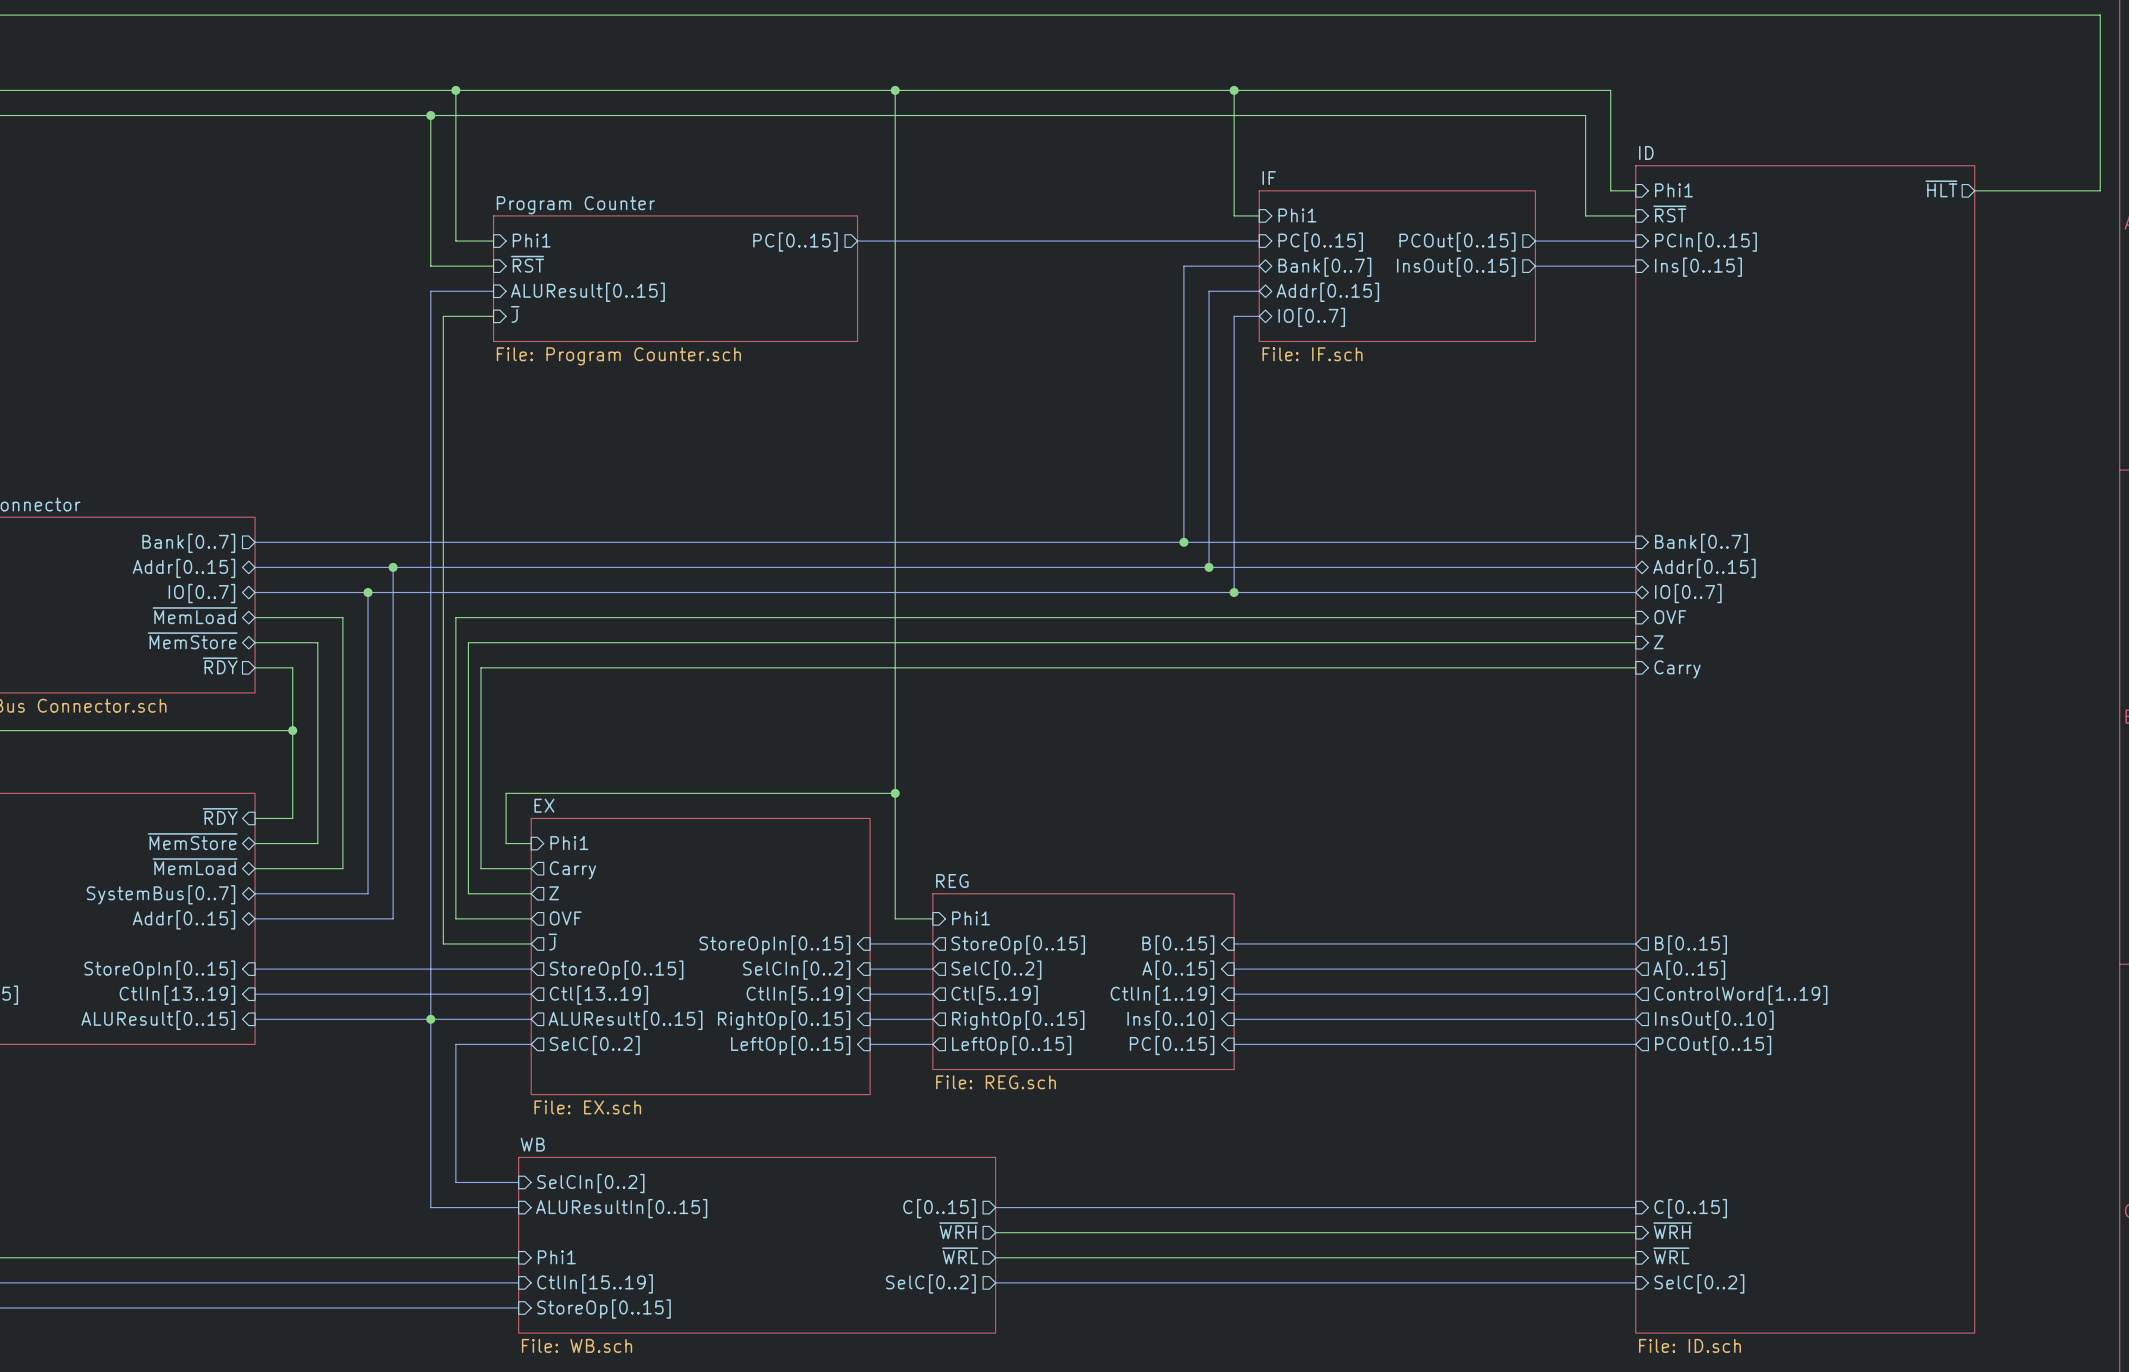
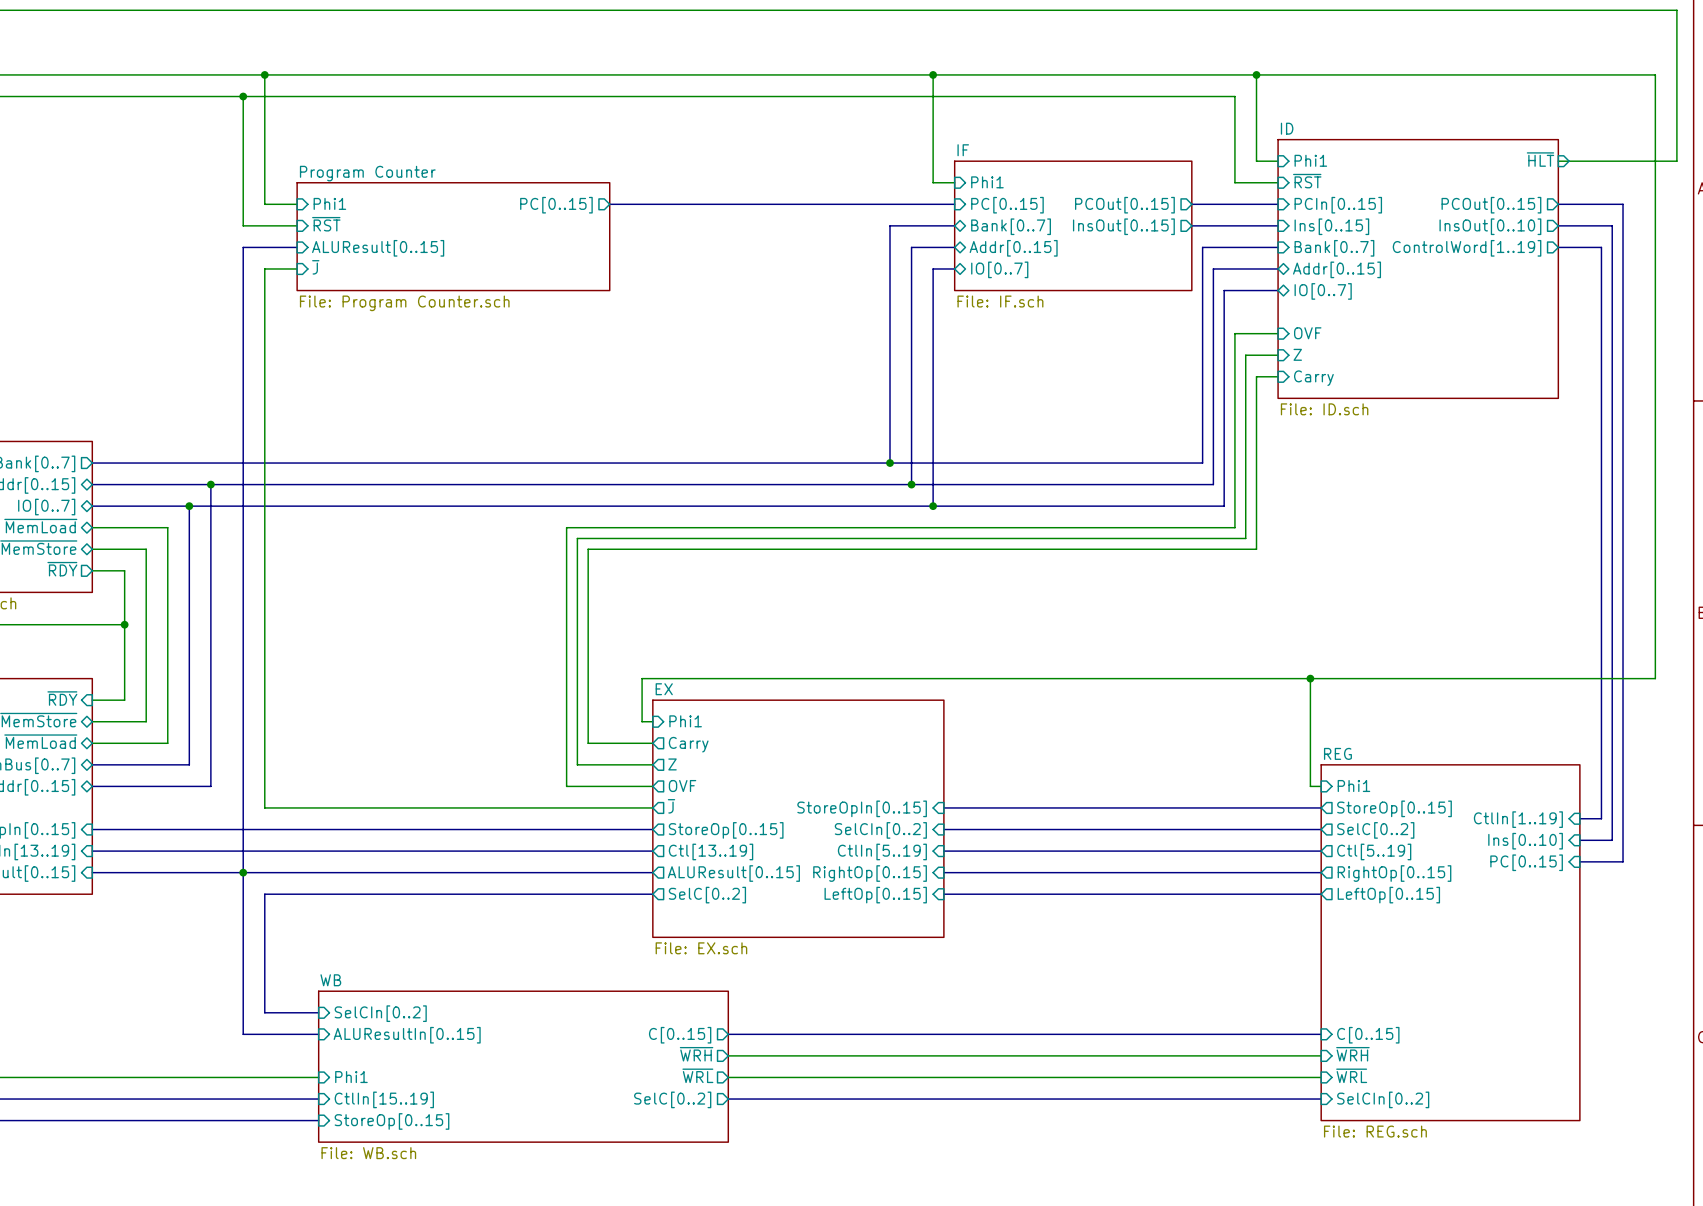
wire: (895, 90) (895, 793) (506, 793) (506, 843) (531, 843) -> none
junction: (895, 90) -> none
wire: none -> (1256, 74) (1655, 74) (1655, 678) (642, 678)
junction: none -> (1256, 74)
wire: none -> (1558, 161) (1569, 161)
bus: none -> (1558, 204) (1623, 204) (1623, 861) (1579, 861)
sheet pin: none -> PCOut[0..15] (1491, 205)
bus: none -> (1558, 225) (1612, 225) (1612, 840) (1579, 840)
sheet pin: none -> InsOut[0..10] (1490, 226)
bus: none -> (1558, 247) (1601, 247) (1601, 818) (1579, 818)
sheet pin: none -> Bank[0..7] (1334, 248)
sheet pin: none -> ControlWord[1..19] (1467, 248)
wire: (455, 316) (443, 316) (443, 943) (455, 943) -> (264, 268) (264, 527)
sheet ID: none -> File: ID.sch (1418, 268)
sheet pin: none -> Addr[0..15] (1337, 269)
sheet pin: none -> IO[0..7] (1323, 291)
wire: none -> (1278, 355) (1245, 355) (1245, 538) (577, 538) (577, 764) (652, 764)
bus: (1547, 542) (1635, 542) -> (1202, 463) (1202, 247) (1278, 247)
sheet pin: Bank[0..7] (1701, 543) -> none
bus: (1560, 567) (1635, 567) -> (1213, 484) (1213, 268) (1278, 268)
sheet pin: Addr[0..15] (1704, 568) -> none
bus: (1573, 592) (1635, 592) -> (1224, 506) (1224, 290) (1278, 290)
sheet pin: IO[0..7] (1688, 593) -> none
wire: (455, 617) (807, 617) -> (642, 786) (566, 786) (566, 527)
wire: (1585, 617) (1635, 617) -> (1234, 527) (1234, 333) (1278, 333)
sheet pin position: OVF (1670, 617) -> OVF (1307, 333)
wire: (832, 642) (468, 642) (468, 893) (531, 893) -> (588, 549) (588, 743) (652, 743)
wire: (1610, 642) (1635, 642) -> (1256, 549) (1256, 376) (1278, 376)
sheet pin position: Z (1658, 642) -> Z (1297, 354)
wire: (1635, 667) (480, 667) (480, 868) (531, 868) -> none
sheet pin position: Carry (1677, 669) -> Carry (1313, 378)
sheet ID: File: ID.sch (1805, 749) -> none
junction: (895, 793) -> none
wire: none -> (1310, 678) (1310, 786) (1321, 786)
junction: none -> (1310, 678)
sheet pin: Phi1 (569, 843) -> none
wire: (895, 843) (895, 918) -> (642, 721) (652, 721)
sheet pin: Carry (572, 870) -> none
sheet pin: none -> Carry (688, 744)
sheet pin: Z (554, 893) -> none
sheet pin: none -> Z (672, 764)
wire: (455, 918) (531, 918) -> (264, 786) (264, 807)
sheet pin: OVF (565, 918) -> none
wire: (907, 918) (932, 918) -> none
sheet pin: none -> OVF (682, 786)
sheet pin position: Phi1 (971, 918) -> Phi1 (685, 721)
sheet pin: none -> Phi1 (1353, 786)
sheet pin: ~{J} (552, 942) -> none
sheet pin: none -> ~{J} (671, 806)
wire: none -> (329, 807) (652, 807)
bus: (870, 943) (932, 943) -> none
bus: (1234, 943) (1246, 943) -> none
bus: none -> (1278, 807) (1321, 807)
sheet pin: StoreOpIn[0..15] (774, 945) -> none
sheet pin position: StoreOp[0..15] (1018, 945) -> StoreOp[0..15] (726, 830)
sheet pin: none -> StoreOpIn[0..15] (862, 808)
sheet pin: B[0..15] (1178, 945) -> none
sheet pin: B[0..15] (1690, 945) -> none
sheet pin: none -> StoreOp[0..15] (1394, 808)
sheet EX: File: EX.sch (700, 956) -> none
sheet EX: none -> File: EX.sch (798, 818)
sheet pin: none -> CtlIn[1..19] (1518, 819)
bus: none -> (329, 829) (620, 829)
bus: (907, 969) (932, 969) -> none
bus: (1234, 969) (1246, 969) -> none
bus: none -> (1278, 829) (1321, 829)
sheet pin: StoreOp[0..15] (616, 970) -> none
sheet pin: SelCIn[0..2] (796, 970) -> none
sheet pin position: SelC[0..2] (996, 970) -> SelC[0..2] (707, 895)
sheet pin: none -> SelCIn[0..2] (880, 830)
sheet pin: A[0..15] (1178, 970) -> none
sheet pin: A[0..15] (1689, 970) -> none
sheet pin: none -> SelC[0..2] (1375, 830)
sheet REG: File: REG.sch (1083, 981) -> none
sheet pin: none -> Ins[0..10] (1525, 841)
bus: none -> (329, 851) (620, 851)
bus: (907, 994) (932, 994) -> none
bus: (1234, 994) (1246, 994) -> none
bus: none -> (1278, 851) (1321, 851)
sheet pin: Ctl[13..19] (598, 995) -> none
sheet pin: CtlIn[5..19] (798, 995) -> none
sheet pin: Ctl[5..19] (994, 995) -> Ctl[13..19] (711, 851)
sheet pin: CtlIn[1..19] (1162, 995) -> CtlIn[5..19] (882, 851)
sheet pin: ControlWord[1..19] (1740, 995) -> Ctl[5..19] (1374, 851)
sheet pin: none -> PC[0..15] (1526, 862)
bus: none -> (329, 872) (620, 872)
bus: (907, 1019) (932, 1019) -> none
bus: (1234, 1019) (1246, 1019) -> none
bus: none -> (1278, 872) (1321, 872)
sheet pin: ALUResult[0..15] (625, 1020) -> none
sheet pin: RightOp[0..15] (784, 1020) -> none
sheet pin: RightOp[0..15] (1018, 1020) -> none
sheet pin: none -> RightOp[0..15] (870, 873)
sheet pin: Ins[0..10] (1170, 1020) -> none
sheet pin: InsOut[0..10] (1714, 1020) -> none
sheet pin: none -> RightOp[0..15] (1394, 873)
bus: none -> (329, 894) (620, 894)
bus: (907, 1044) (932, 1044) -> none
bus: (1234, 1044) (1246, 1044) -> none
bus: none -> (1278, 894) (1321, 894)
sheet pin: SelC[0..2] (594, 1045) -> none
sheet pin: LeftOp[0..15] (790, 1045) -> none
sheet pin: LeftOp[0..15] (1011, 1045) -> ALUResult[0..15] (733, 873)
sheet pin: PC[0..15] (1172, 1045) -> LeftOp[0..15] (875, 895)
sheet pin: PCOut[0..15] (1713, 1045) -> none
sheet pin: none -> LeftOp[0..15] (1388, 895)
sheet REG: none -> File: REG.sch (1450, 942)
bus: none -> (1278, 1034) (1321, 1034)
sheet pin position: C[0..15] (1690, 1208) -> C[0..15] (1368, 1035)
sheet pin position: ~{WRH} (1672, 1230) -> ~{WRH} (1352, 1054)
wire: none -> (1278, 1055) (1321, 1055)
sheet pin position: ~{WRL} (1671, 1255) -> ~{WRL} (1351, 1075)
wire: none -> (1278, 1077) (1321, 1077)
bus: none -> (1278, 1099) (1321, 1099)
sheet pin: SelC[0..2] (1699, 1283) -> SelCIn[0..2] (1383, 1099)

